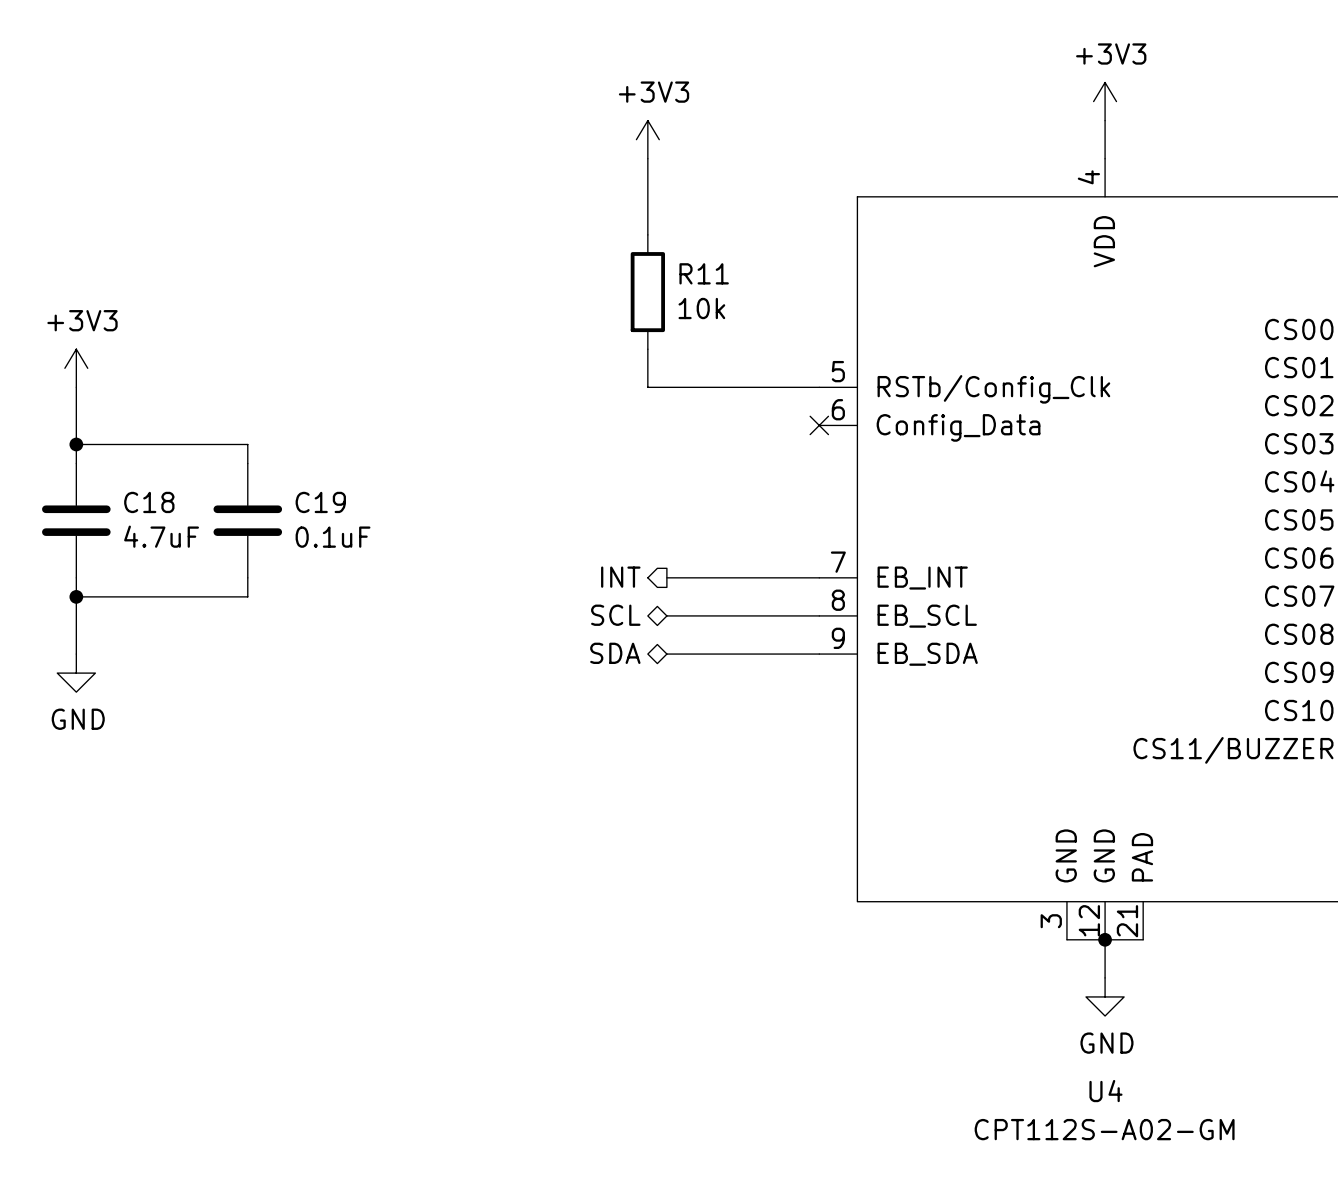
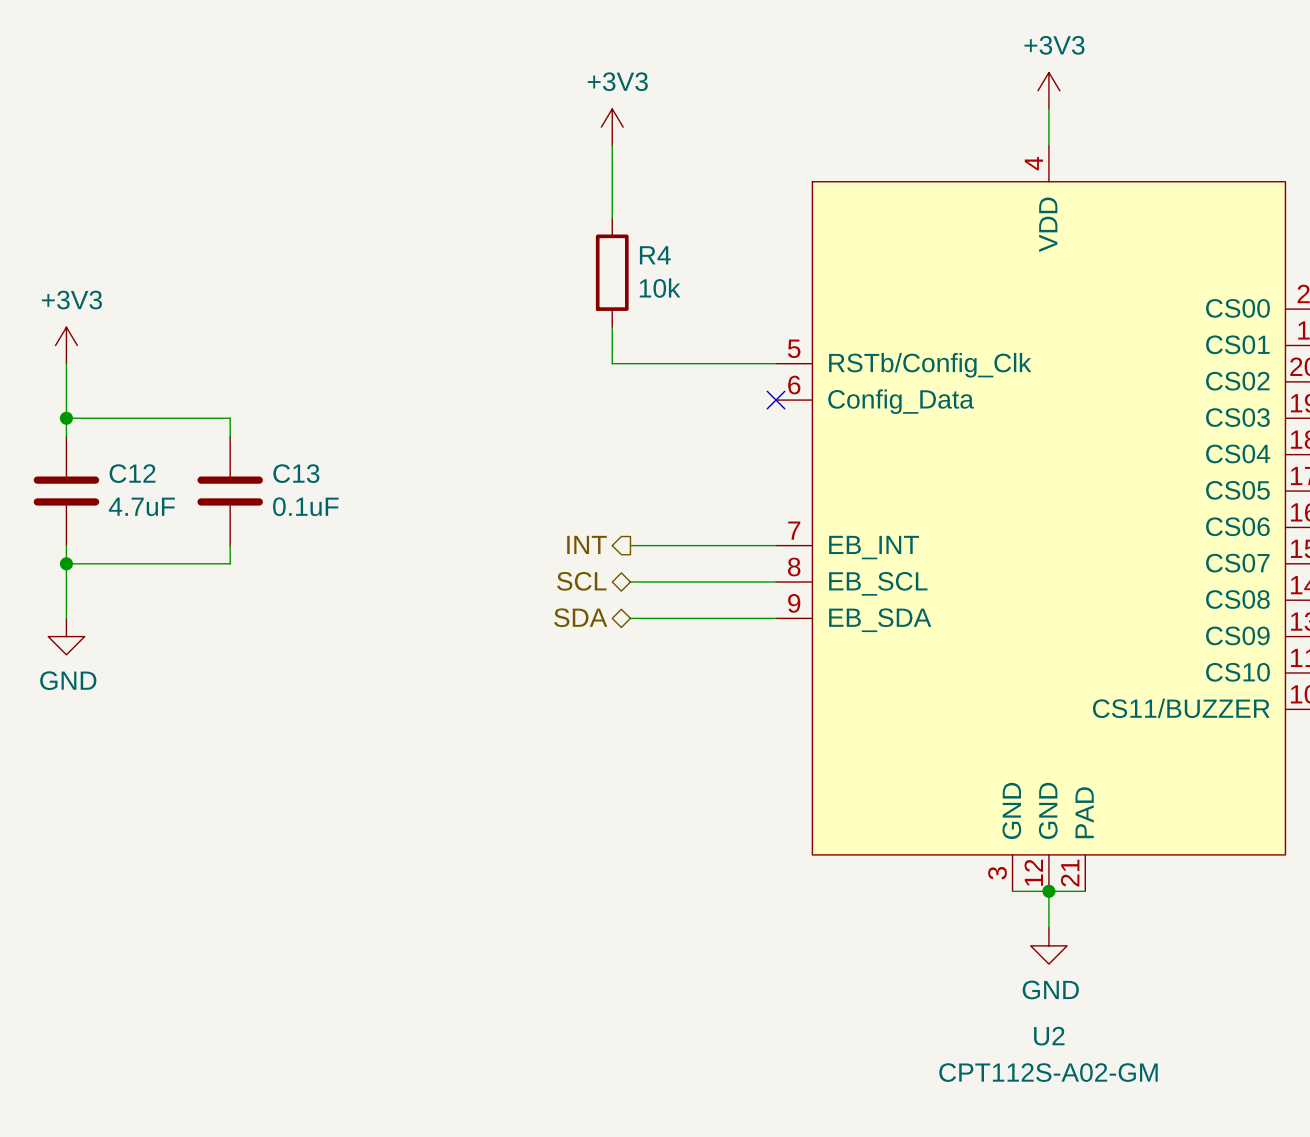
R11 name: R11 (704, 273) -> R4 (655, 255)
C18 name: C18 (149, 502) -> C12 (132, 473)
C19 name: C19 (320, 502) -> C13 (296, 473)
U4 name: U4 (1105, 1091) -> U2 (1049, 1036)

